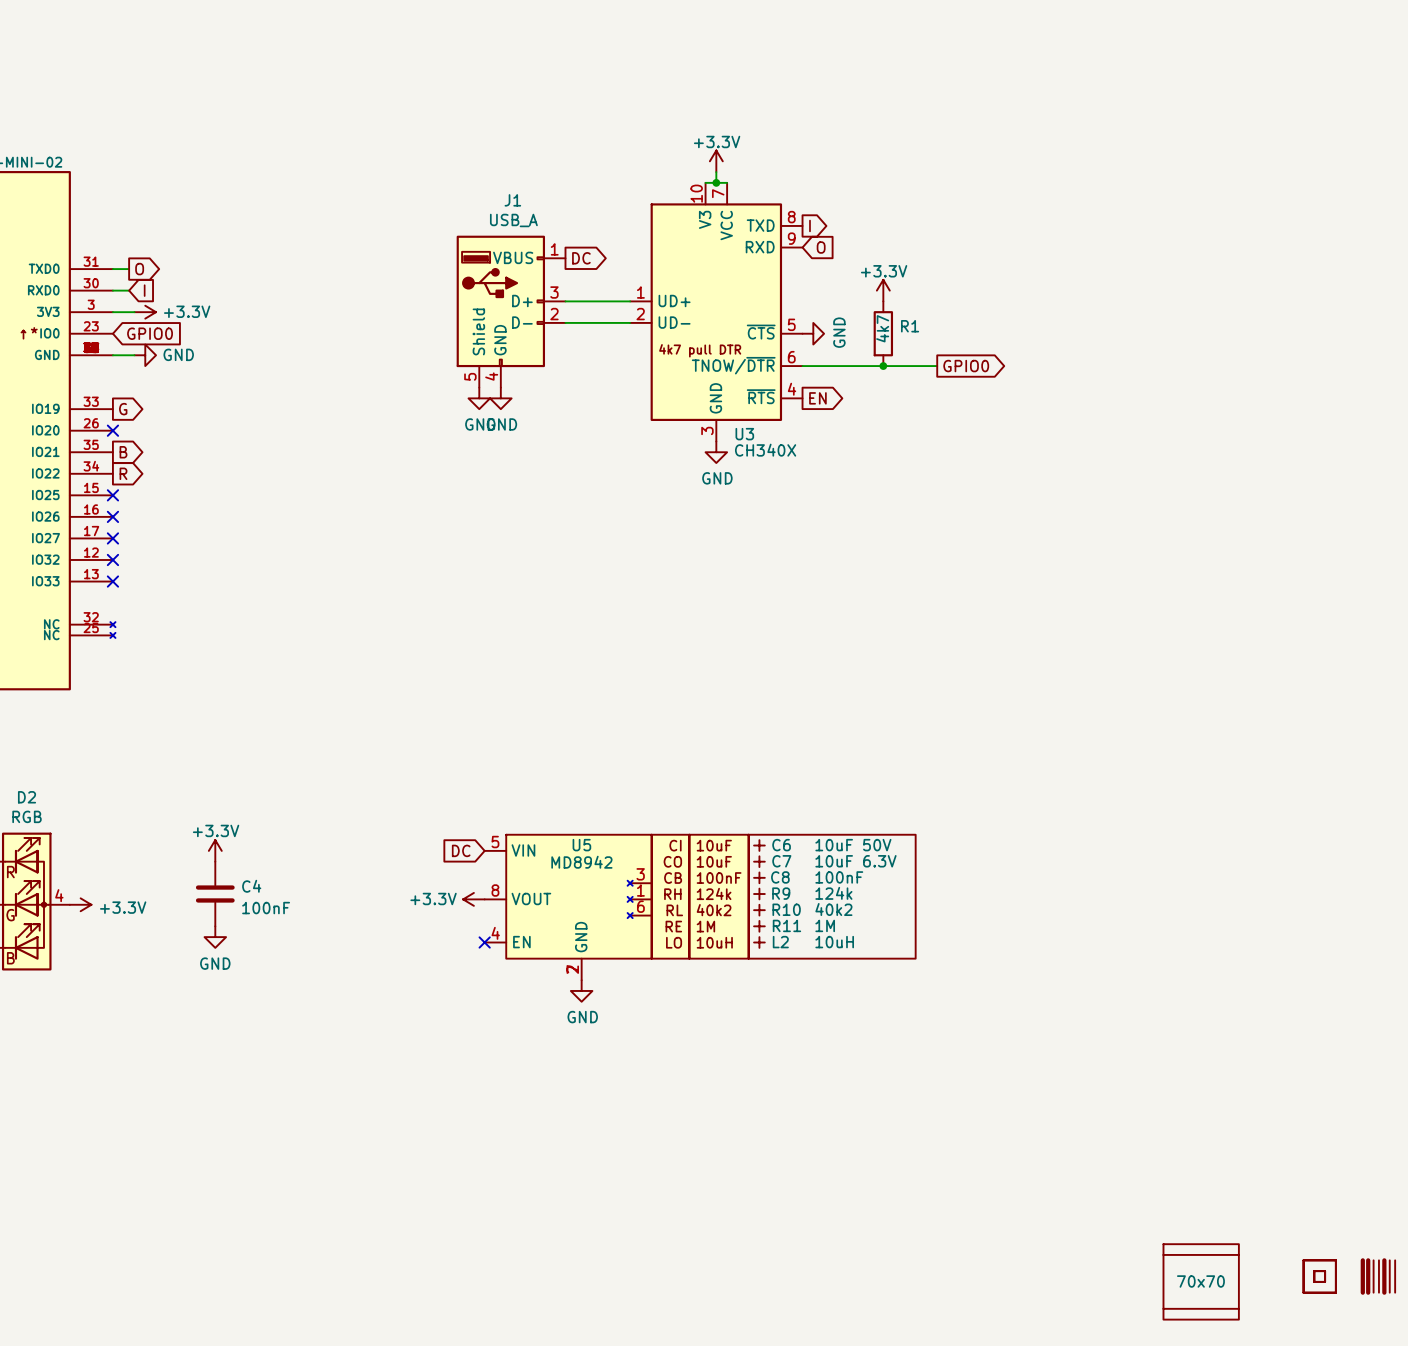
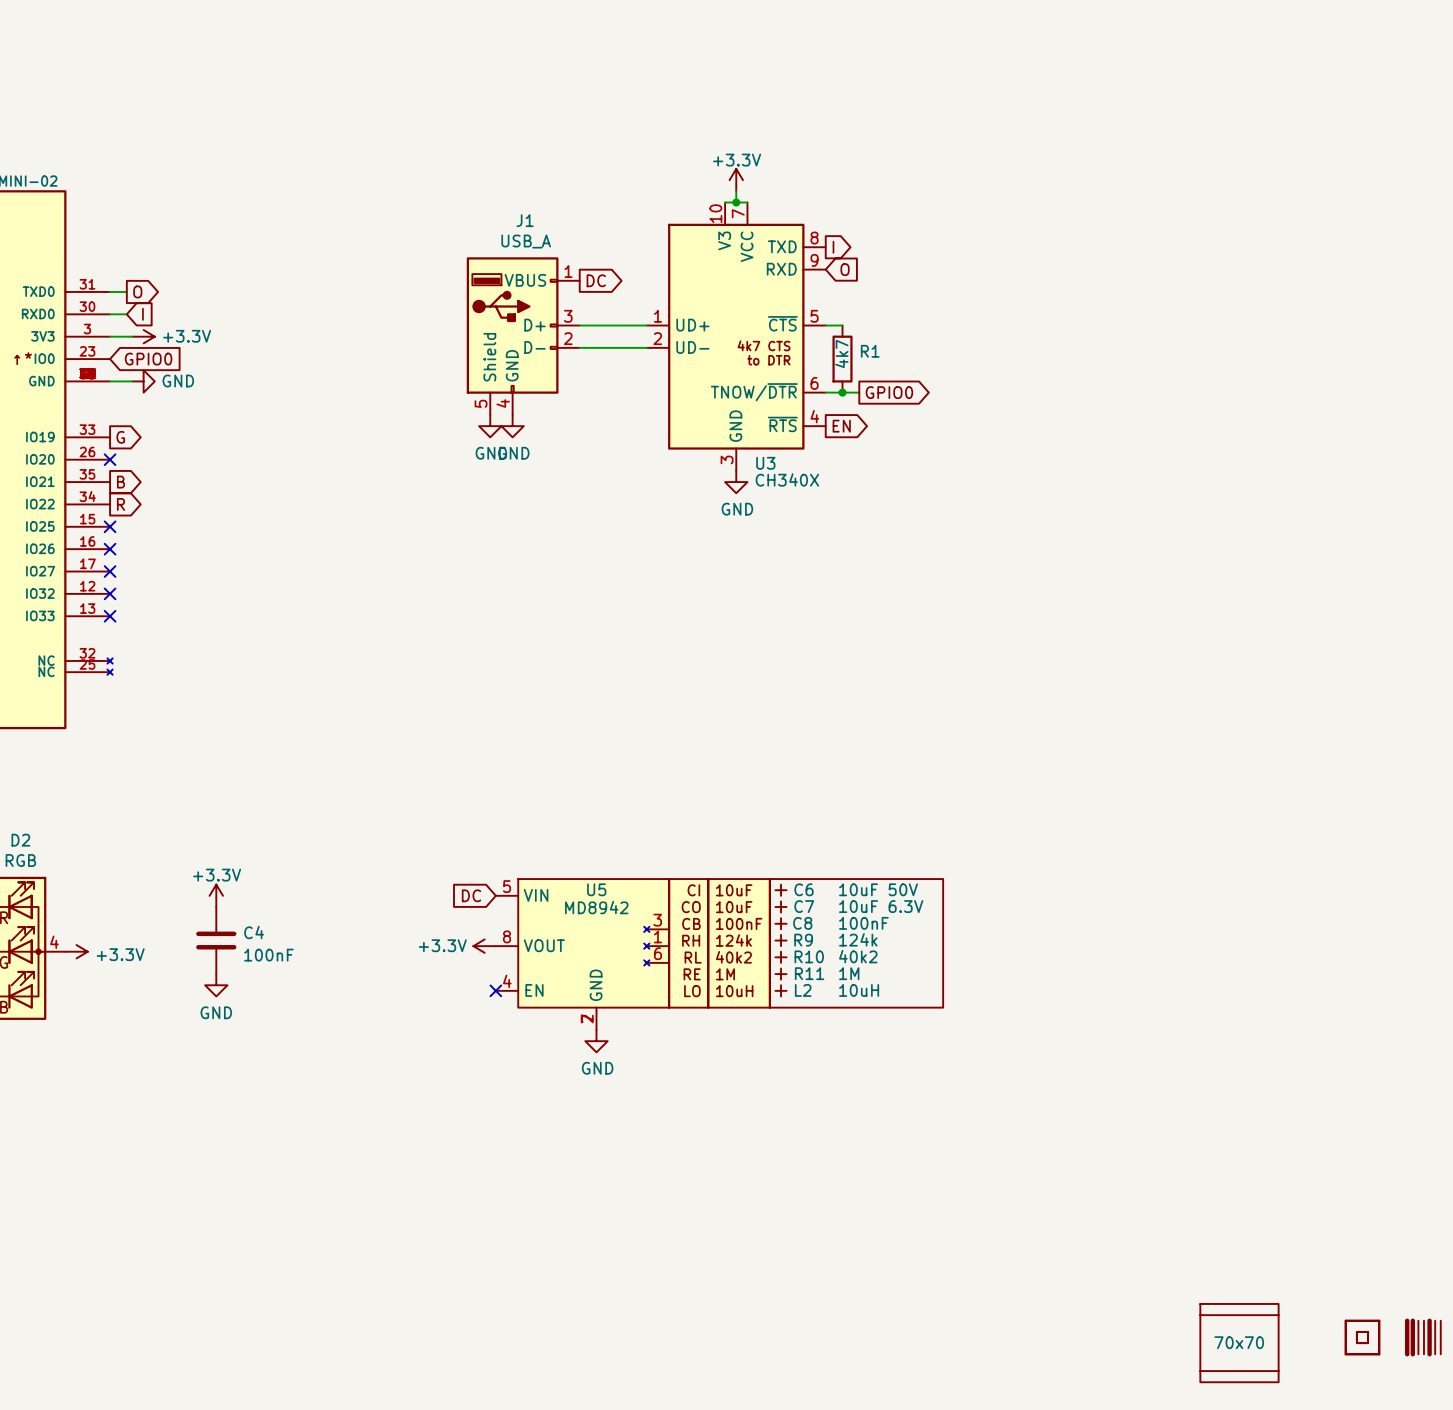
U3 symbol: [630, 182, 803, 442] -> [646, 202, 826, 471]
power symbol: +3.3V (883, 290) -> none
wire: none -> (825, 325) (842, 325)
power symbol: GND (813, 333) -> none
R1 position: (883, 333) -> (842, 359)
junction: none -> (842, 392)
wire: (834, 366) (937, 366) -> none
junction: (883, 366) -> none
global label position: GPIO0 (966, 366) -> GPIO0 (889, 392)

